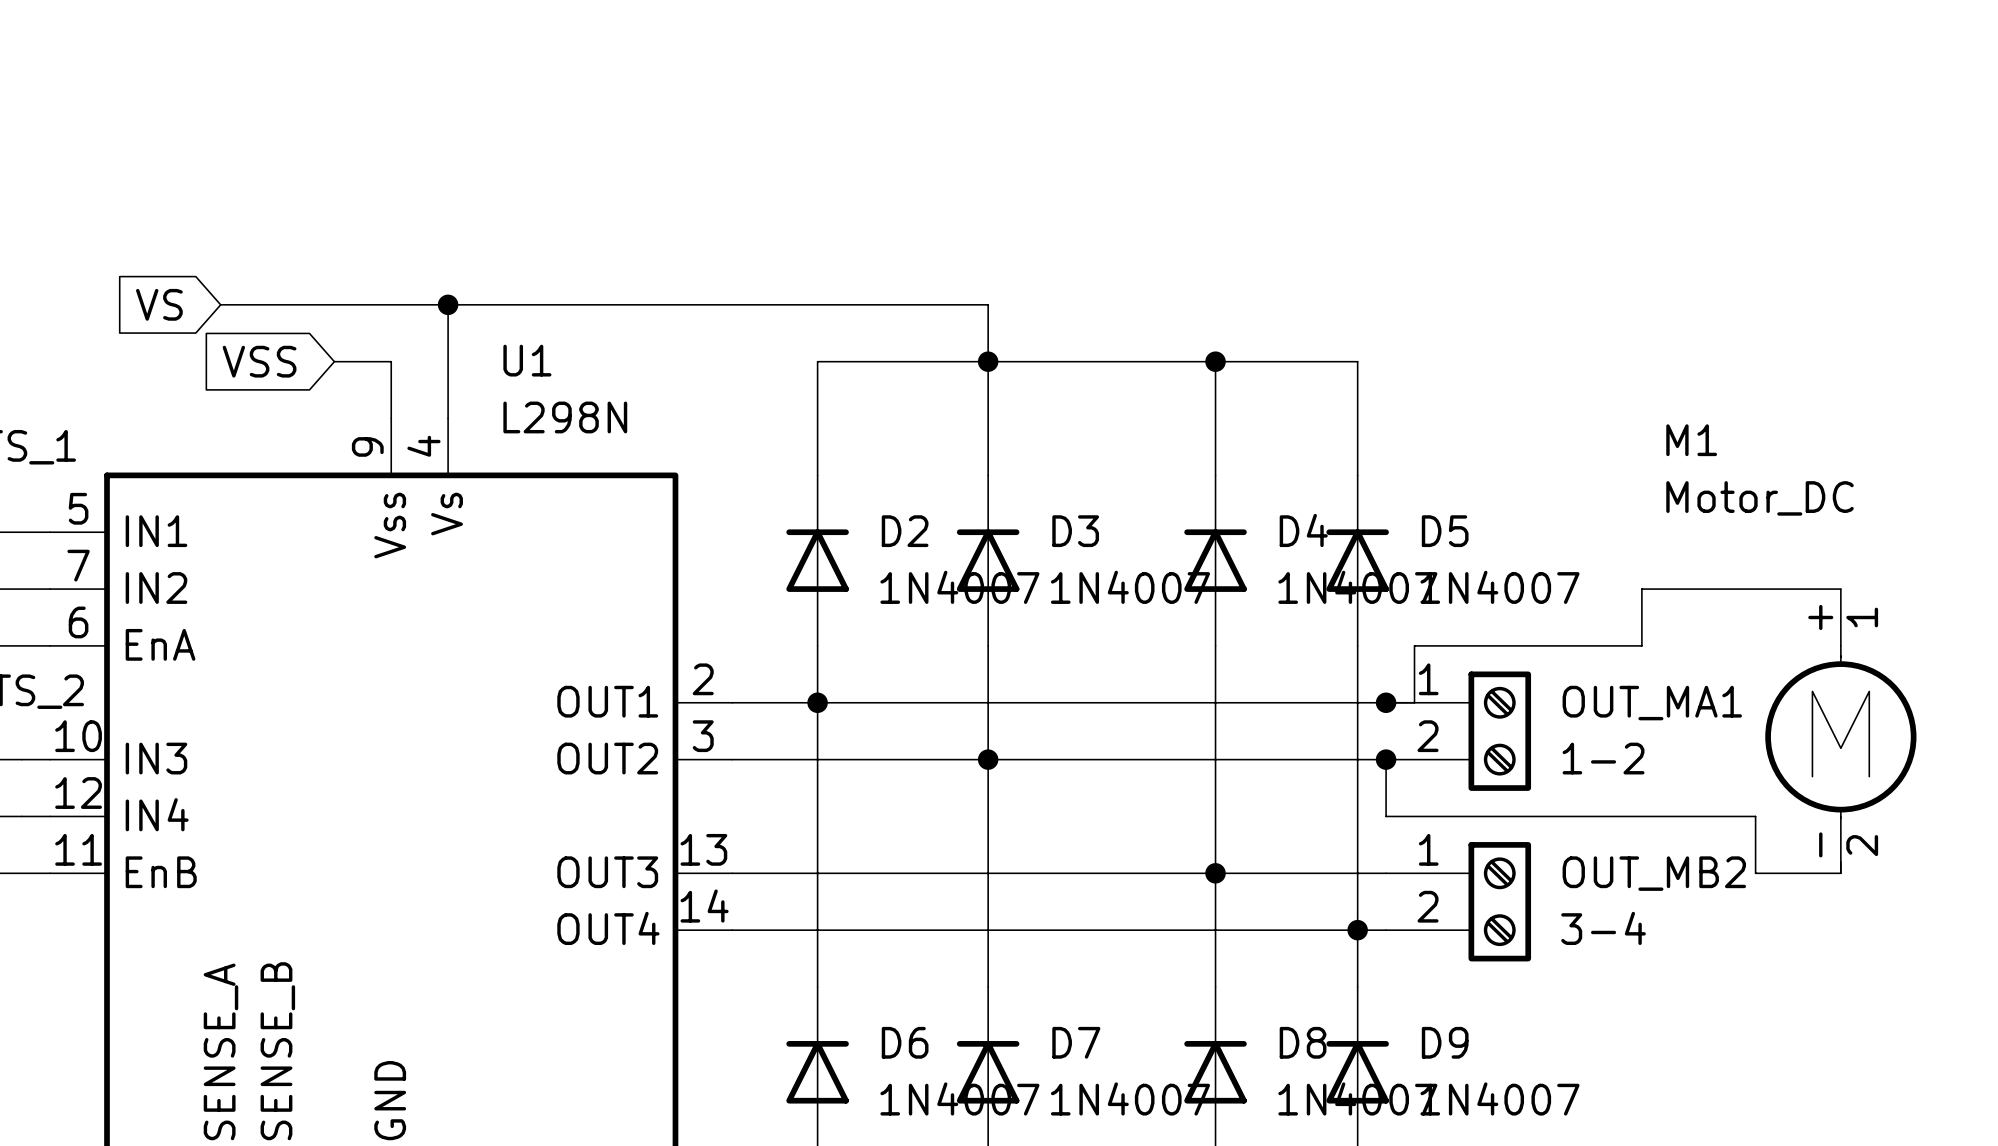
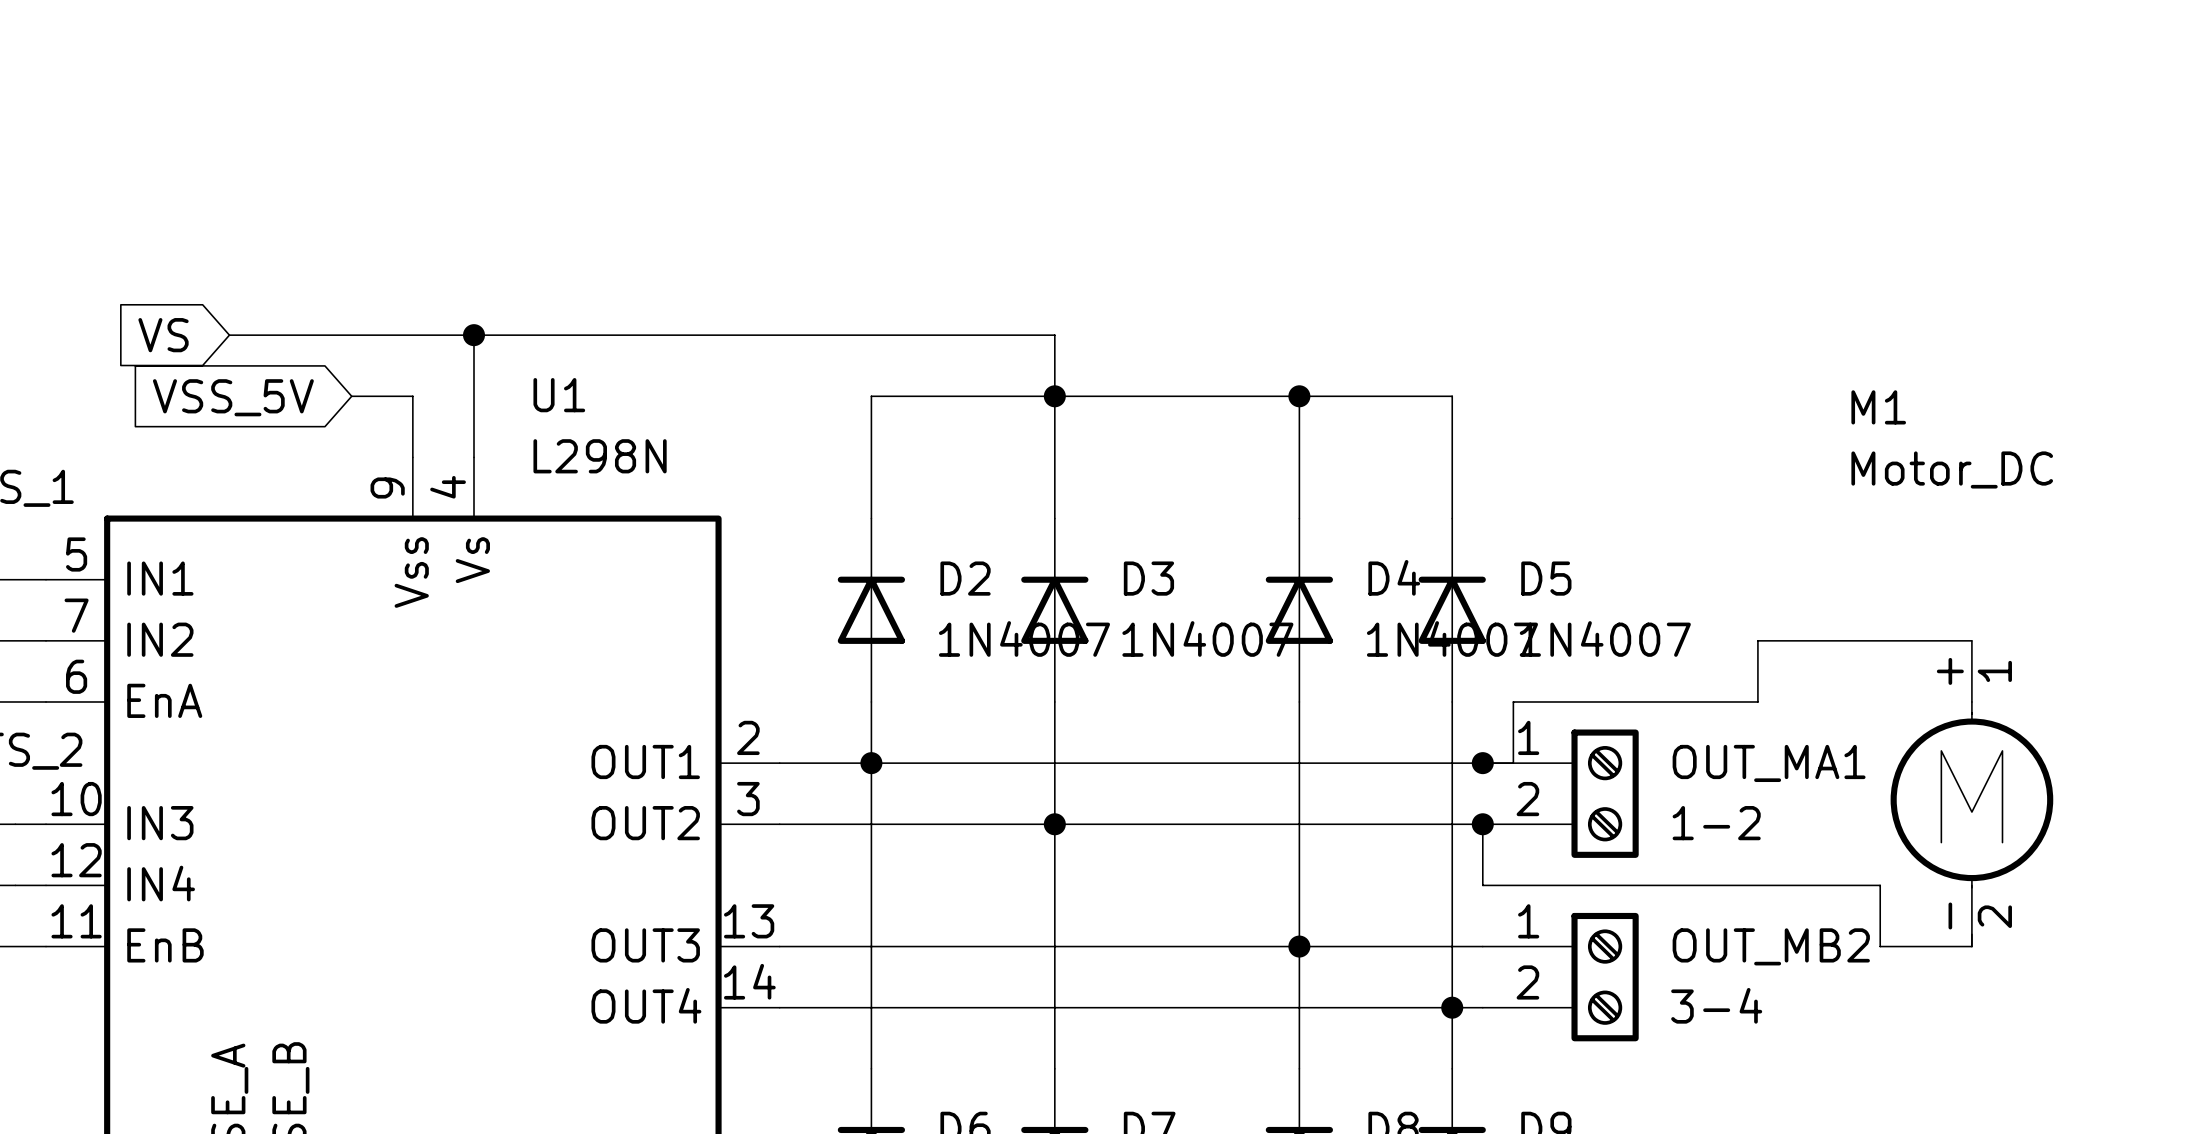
global label: VSS (259, 361) -> VSS_5V (233, 397)
M1 name position: M1 (1691, 440) -> M1 (1878, 407)
M1 value position: Motor_DC (1760, 498) -> Motor_DC (1952, 469)

